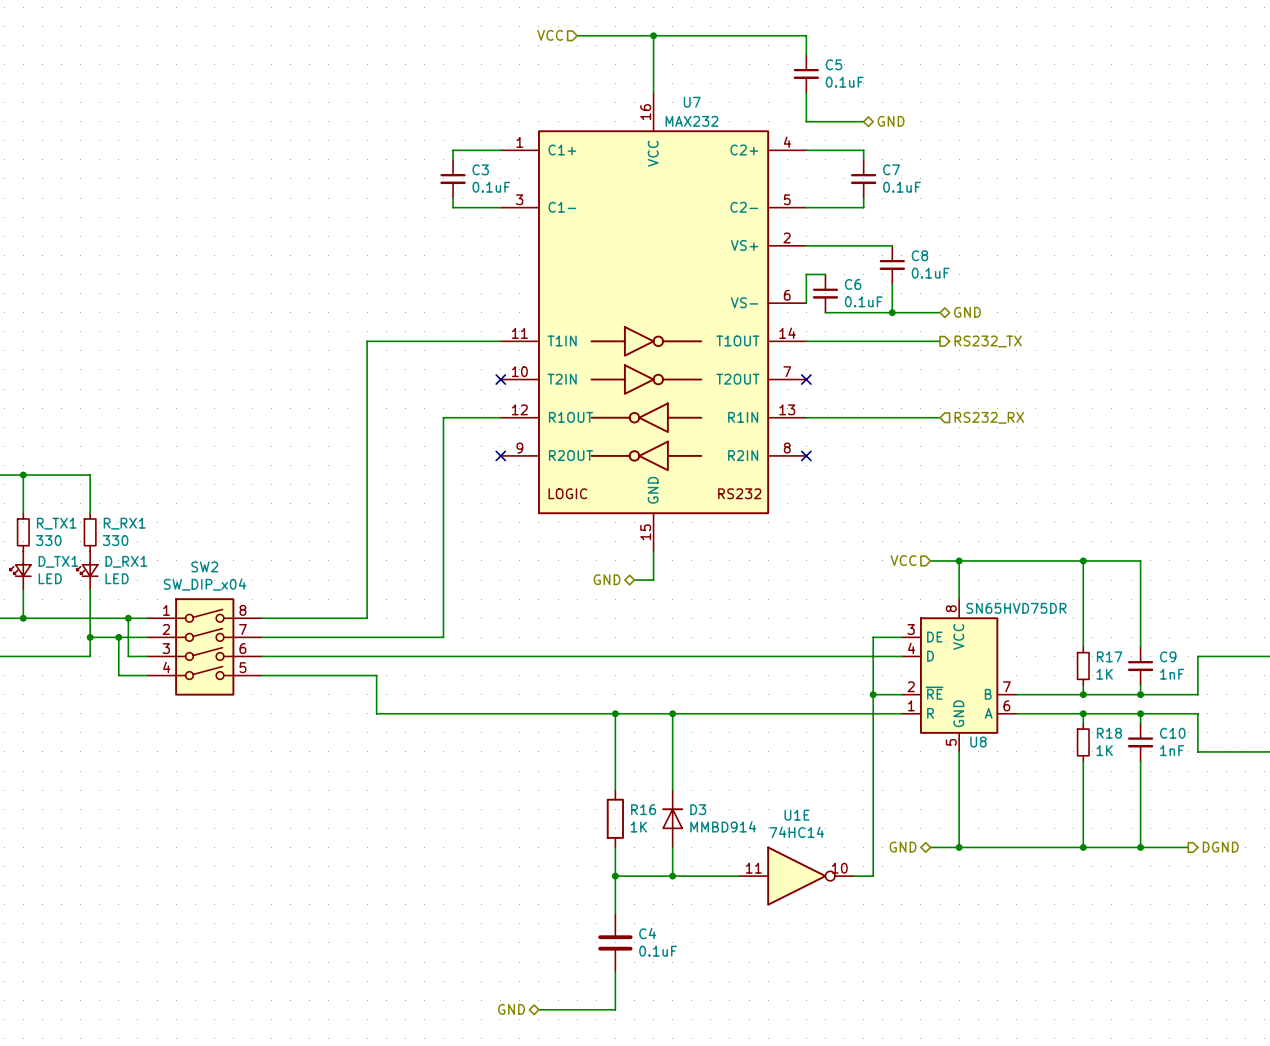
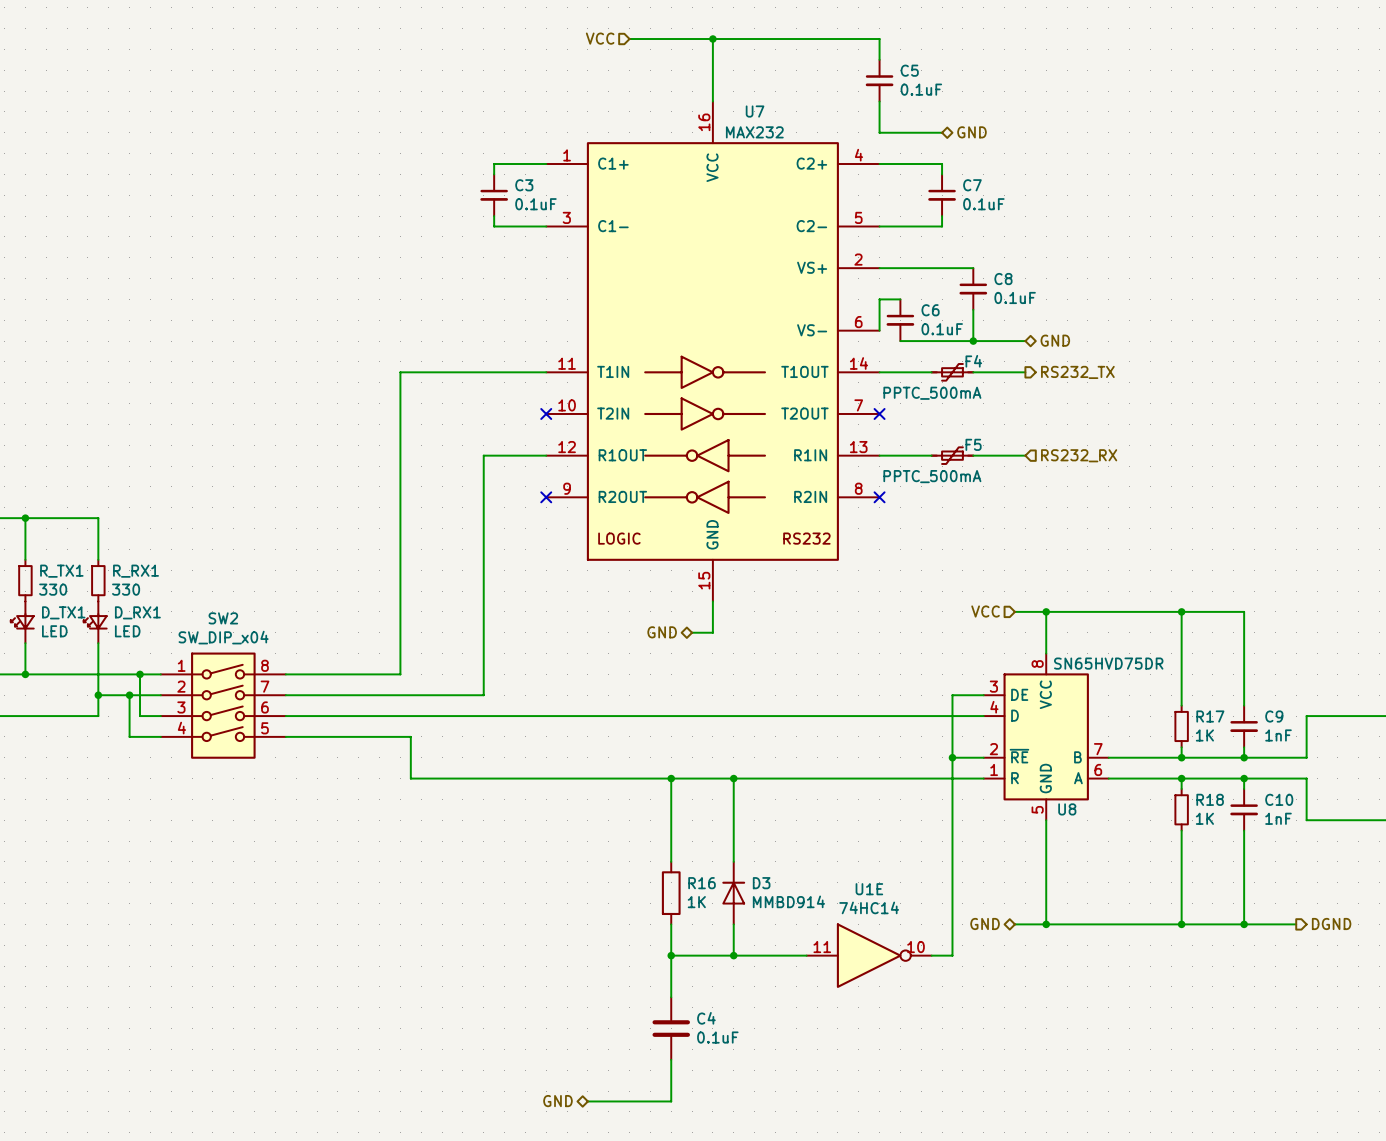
F4: none -> PPTC_500mA (952, 372)
F5: none -> PPTC_500mA (952, 455)

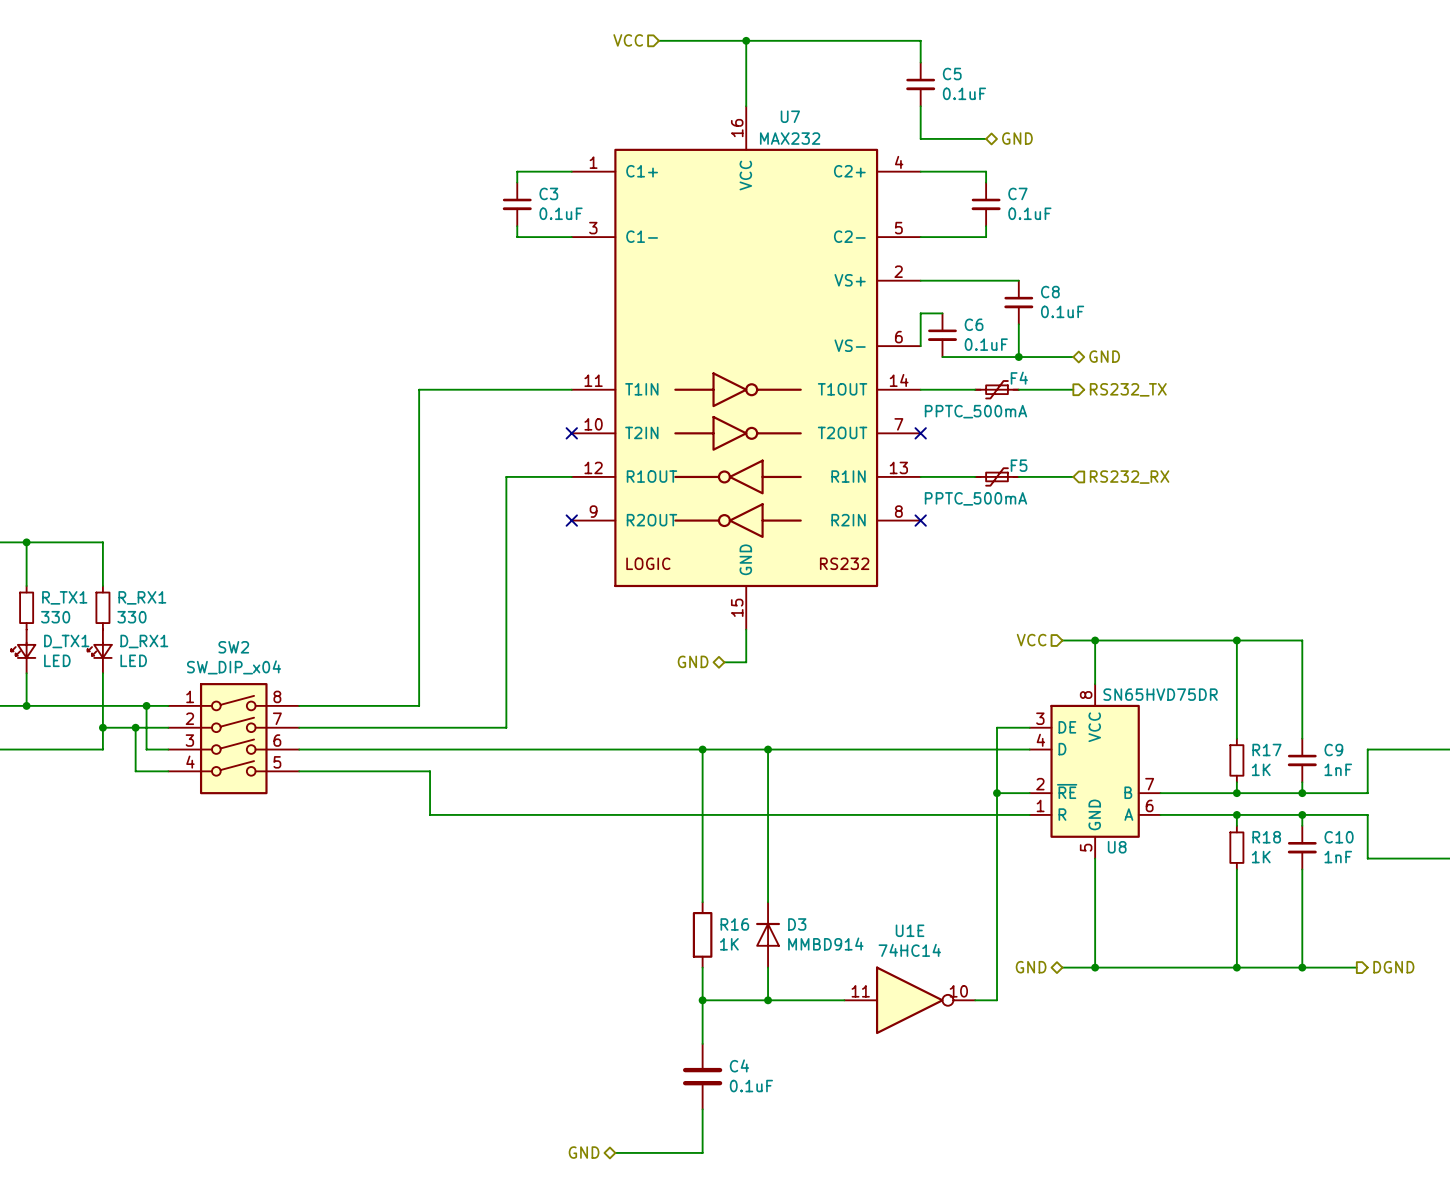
wire: none -> (702, 749) (702, 814)
junction: none -> (702, 749)
wire: none -> (768, 749) (768, 814)
junction: none -> (768, 749)
junction: (671, 778) -> none
junction: (733, 778) -> none

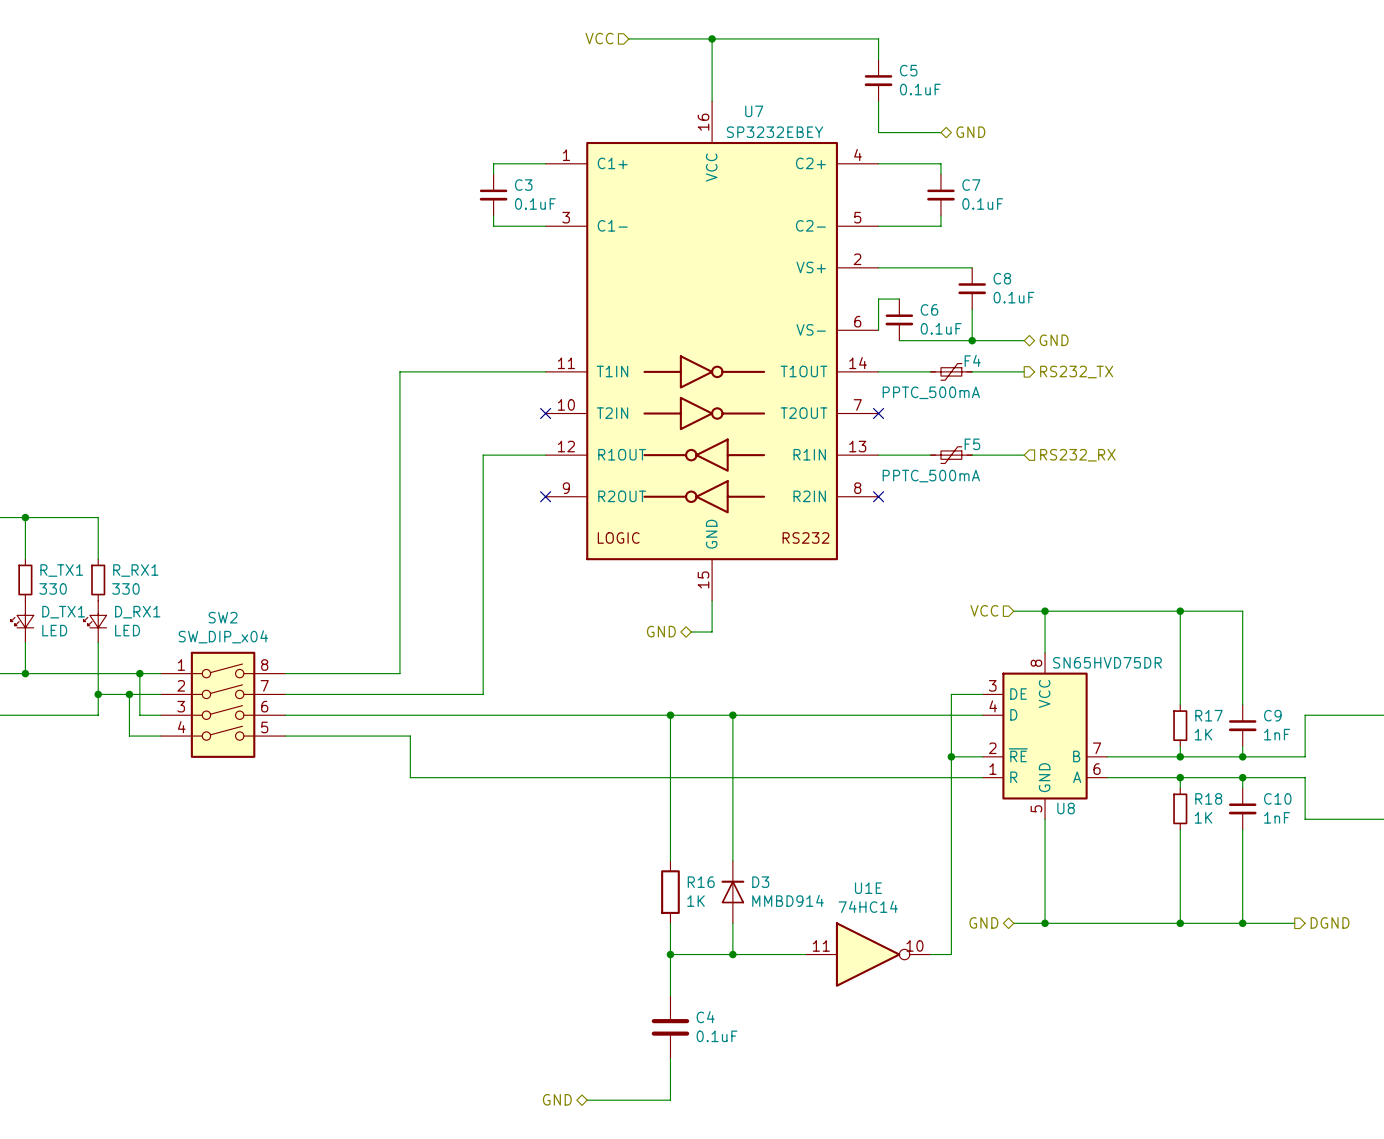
U7 value: MAX232 (790, 138) -> SP3232EBEY (775, 132)

